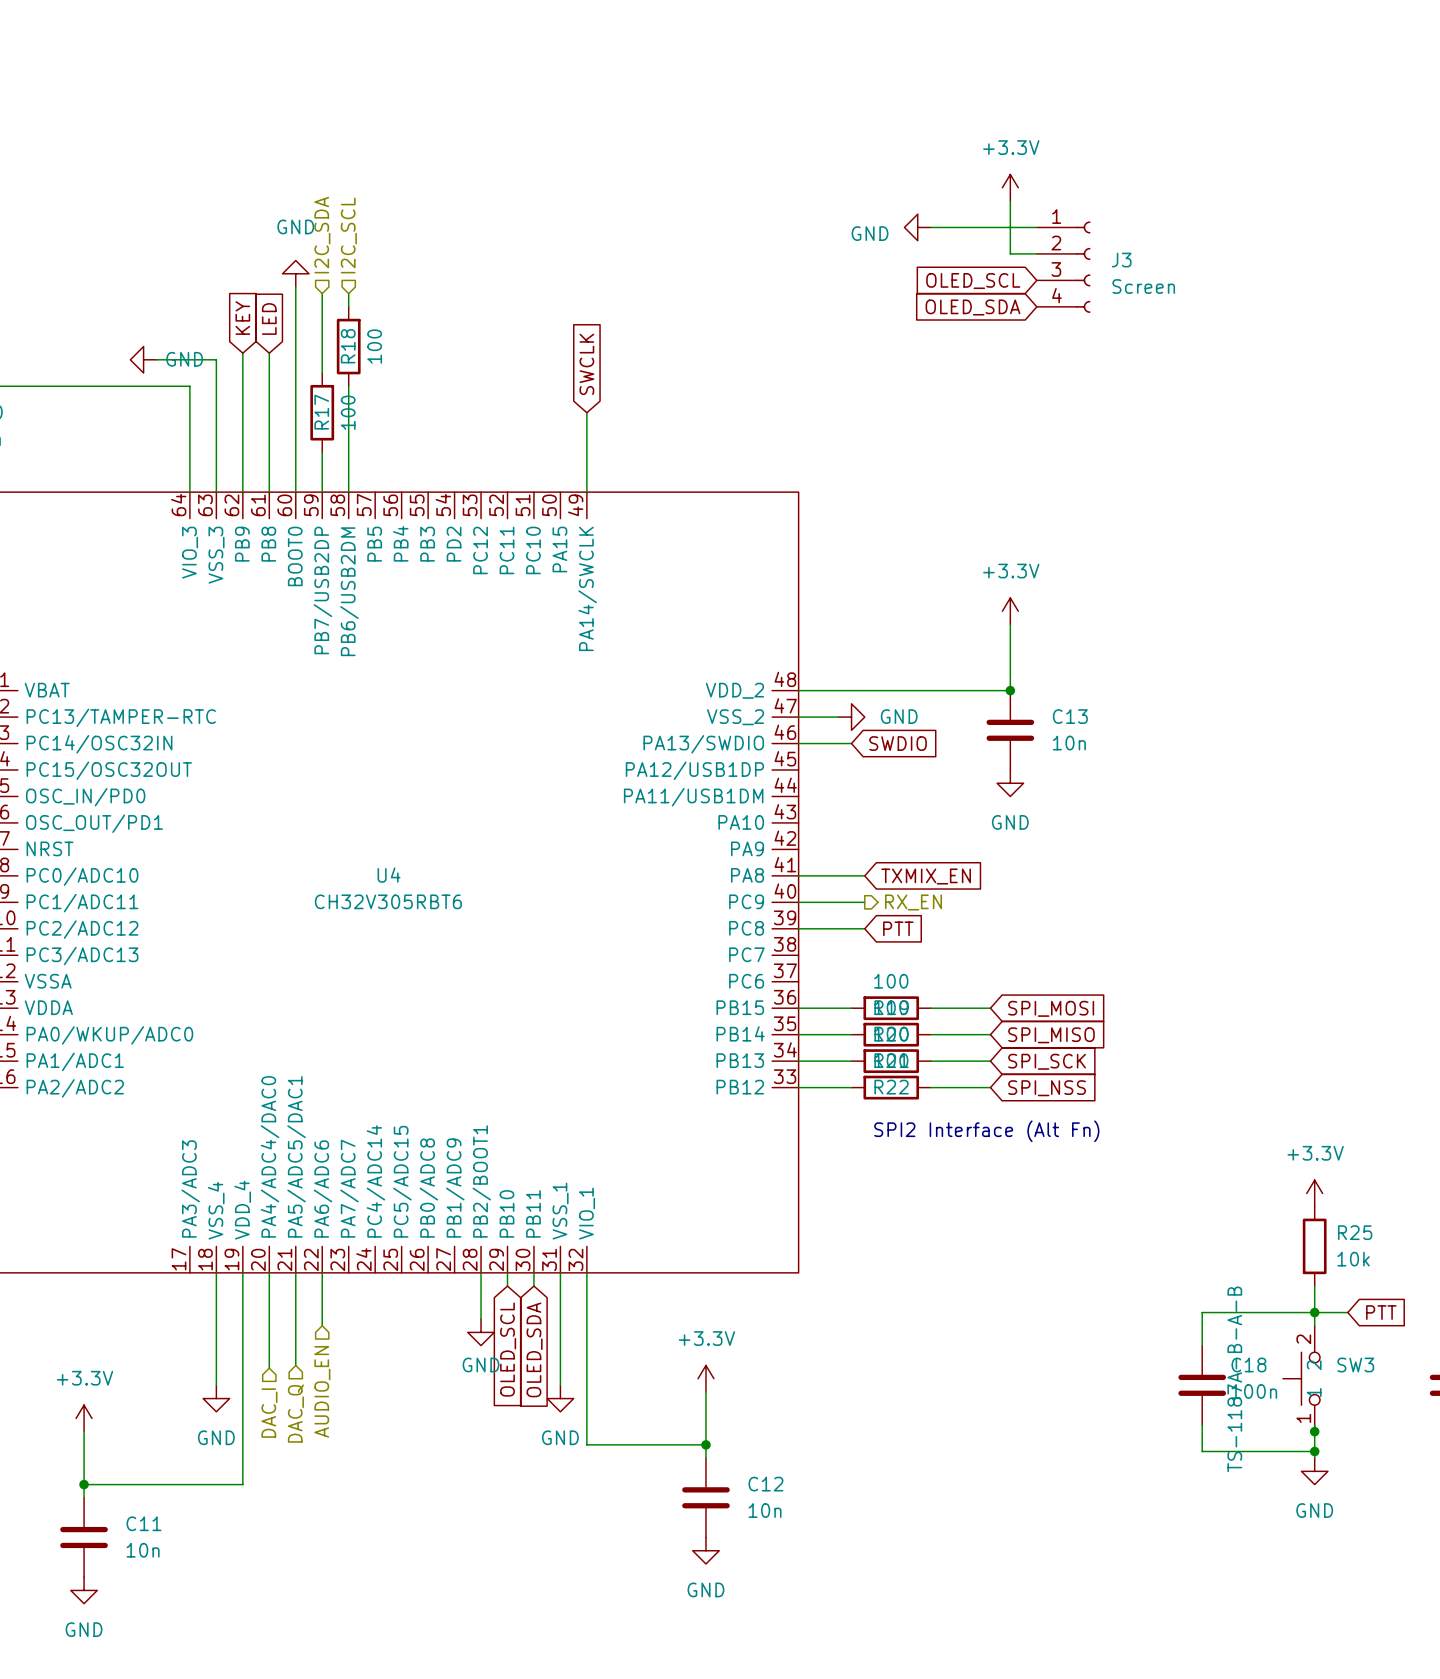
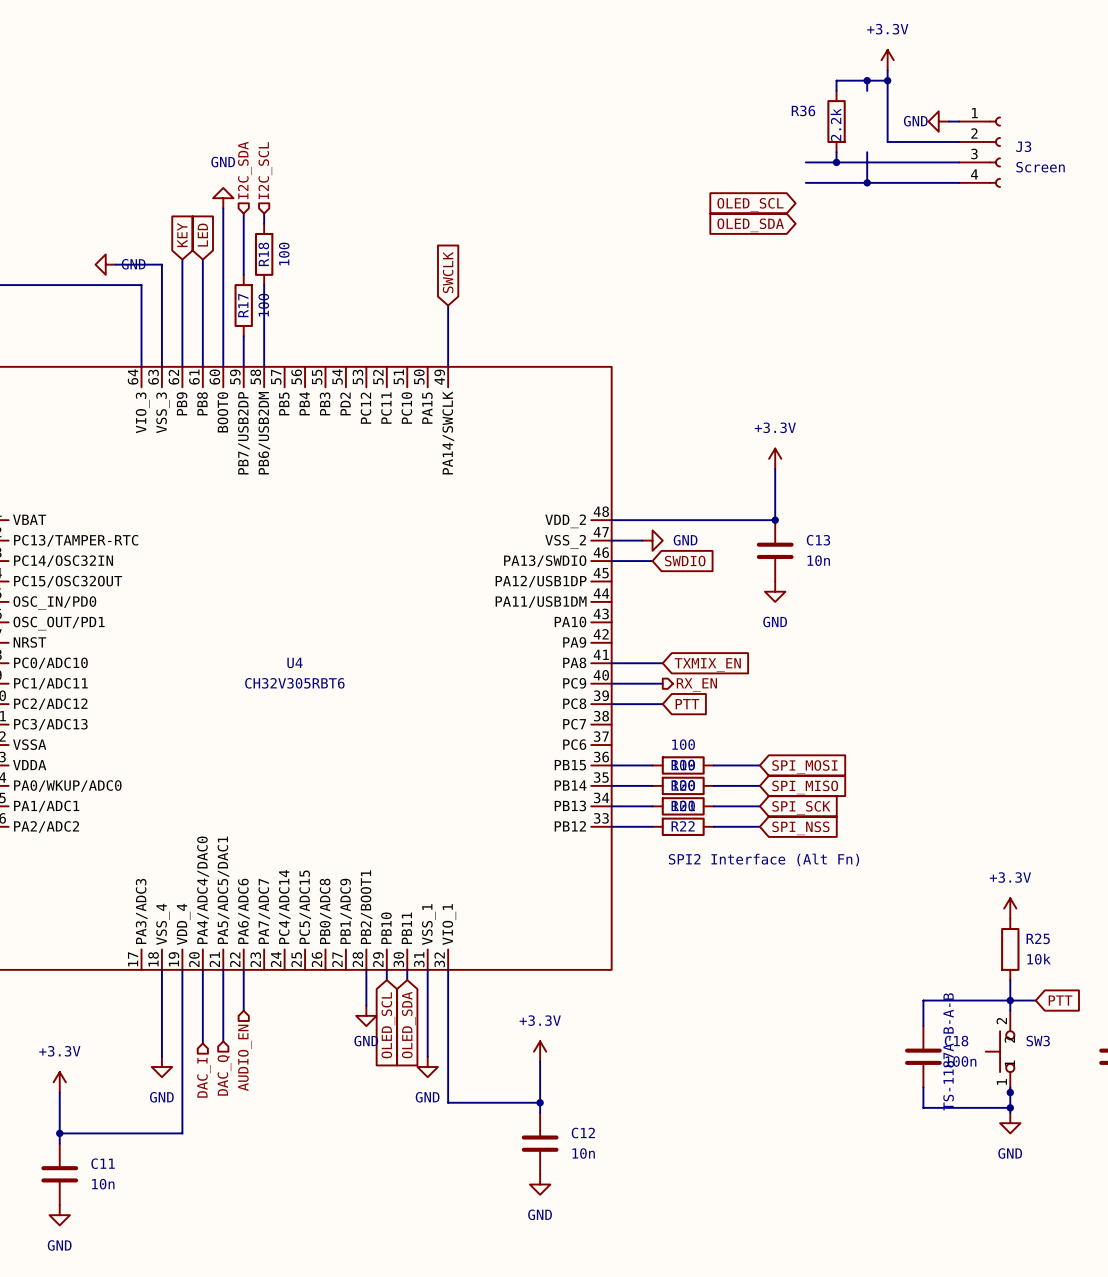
wire: none -> (887, 70) (887, 141) (959, 141)
wire: none -> (867, 80) (867, 90)
junction: none -> (867, 80)
wire: none -> (887, 80) (836, 80) (836, 90)
junction: none -> (887, 80)
R36: none -> 2.2k (836, 121)
power symbol: none -> GND (938, 121)
wire: none -> (948, 121) (959, 121)
power symbol position: +3.3V (1010, 187) -> +3.3V (887, 60)
wire: (1010, 201) (1010, 253) (1036, 253) -> none
wire: none -> (836, 152) (836, 162)
wire: none -> (867, 152) (867, 182)
power symbol: GND (917, 227) -> none
wire: (930, 227) (1036, 227) -> none
wire: none -> (805, 162) (959, 162)
junction: none -> (836, 162)
wire: none -> (805, 182) (959, 182)
junction: none -> (867, 182)
J3 position: (1063, 267) -> (979, 152)

